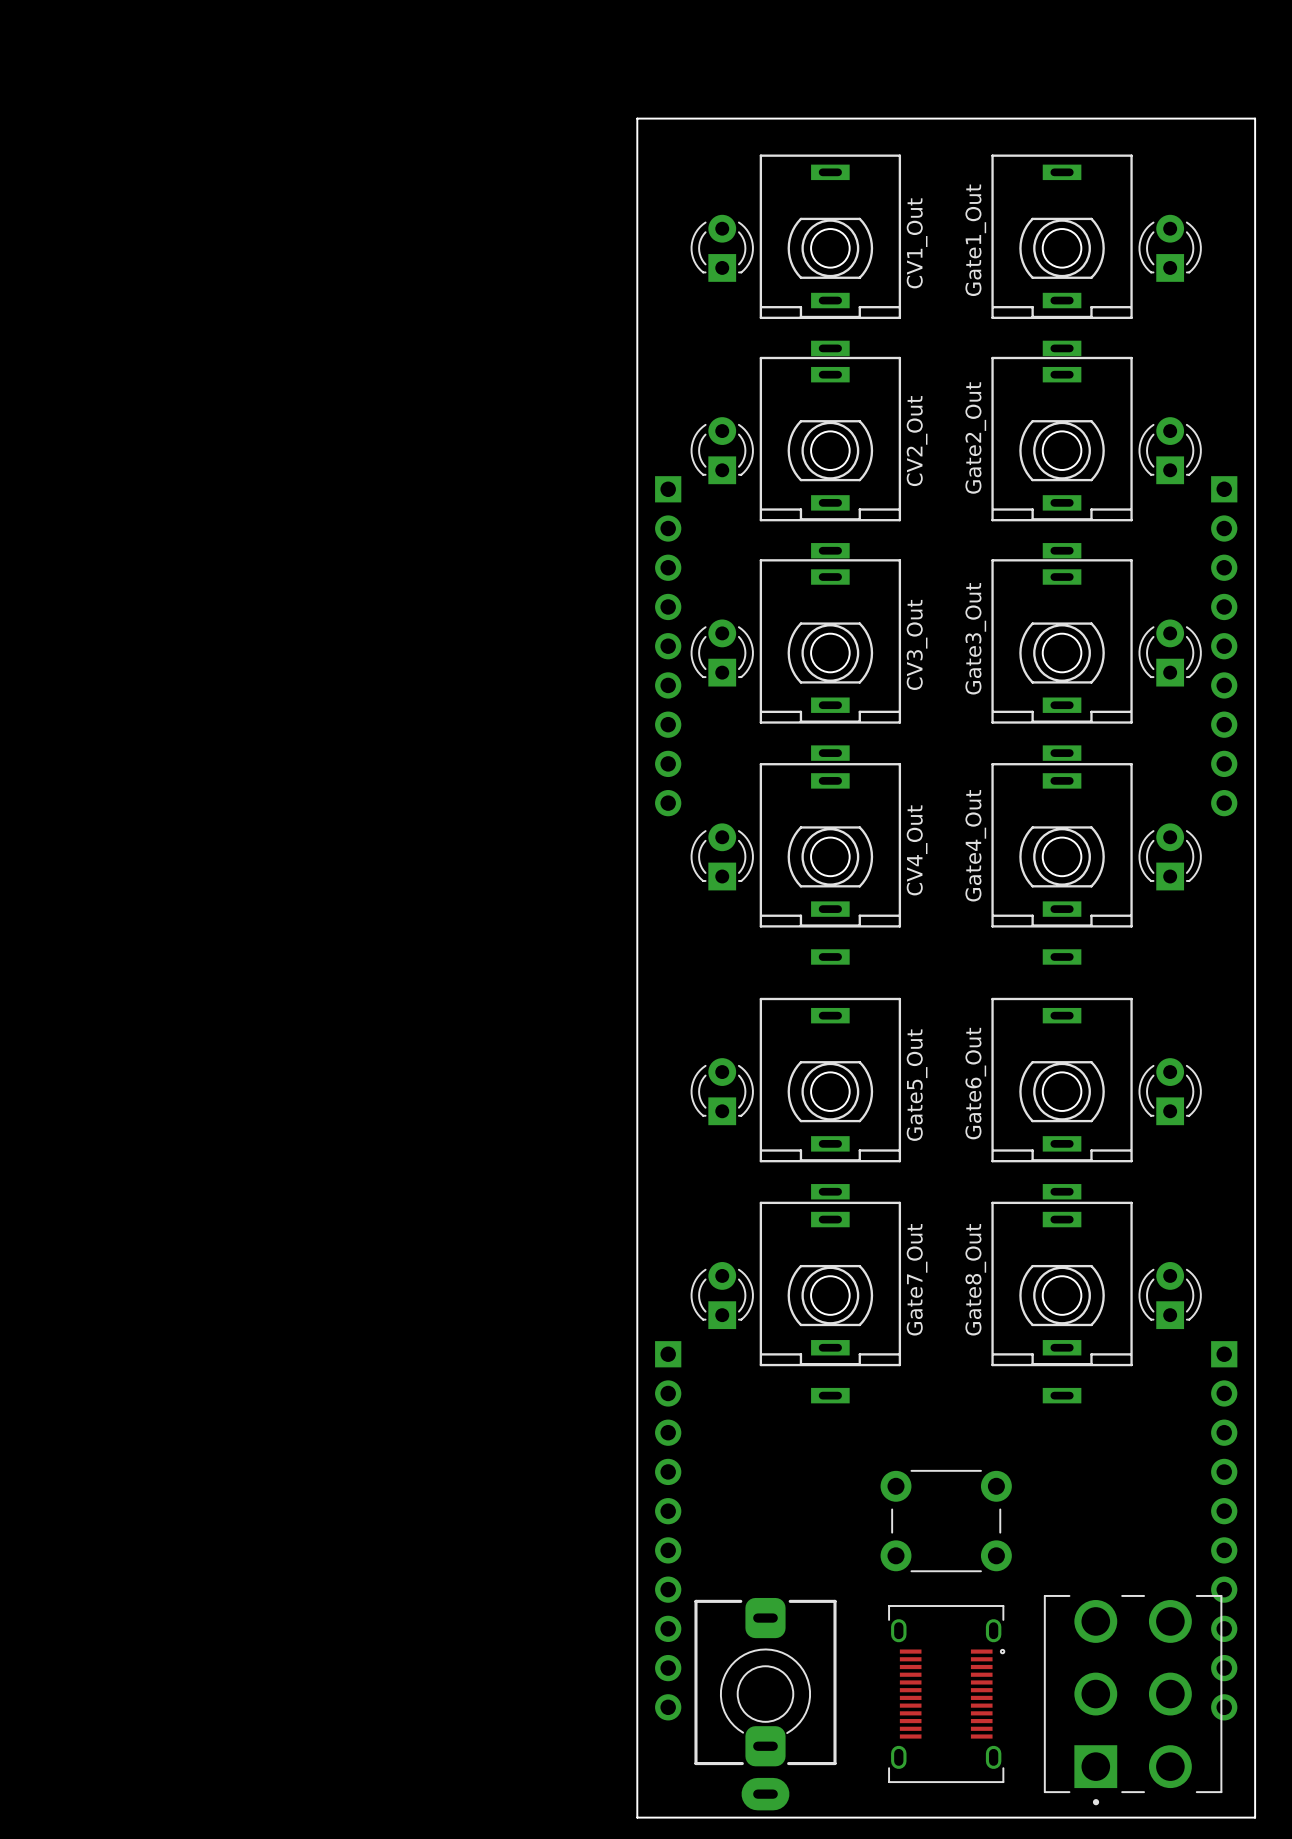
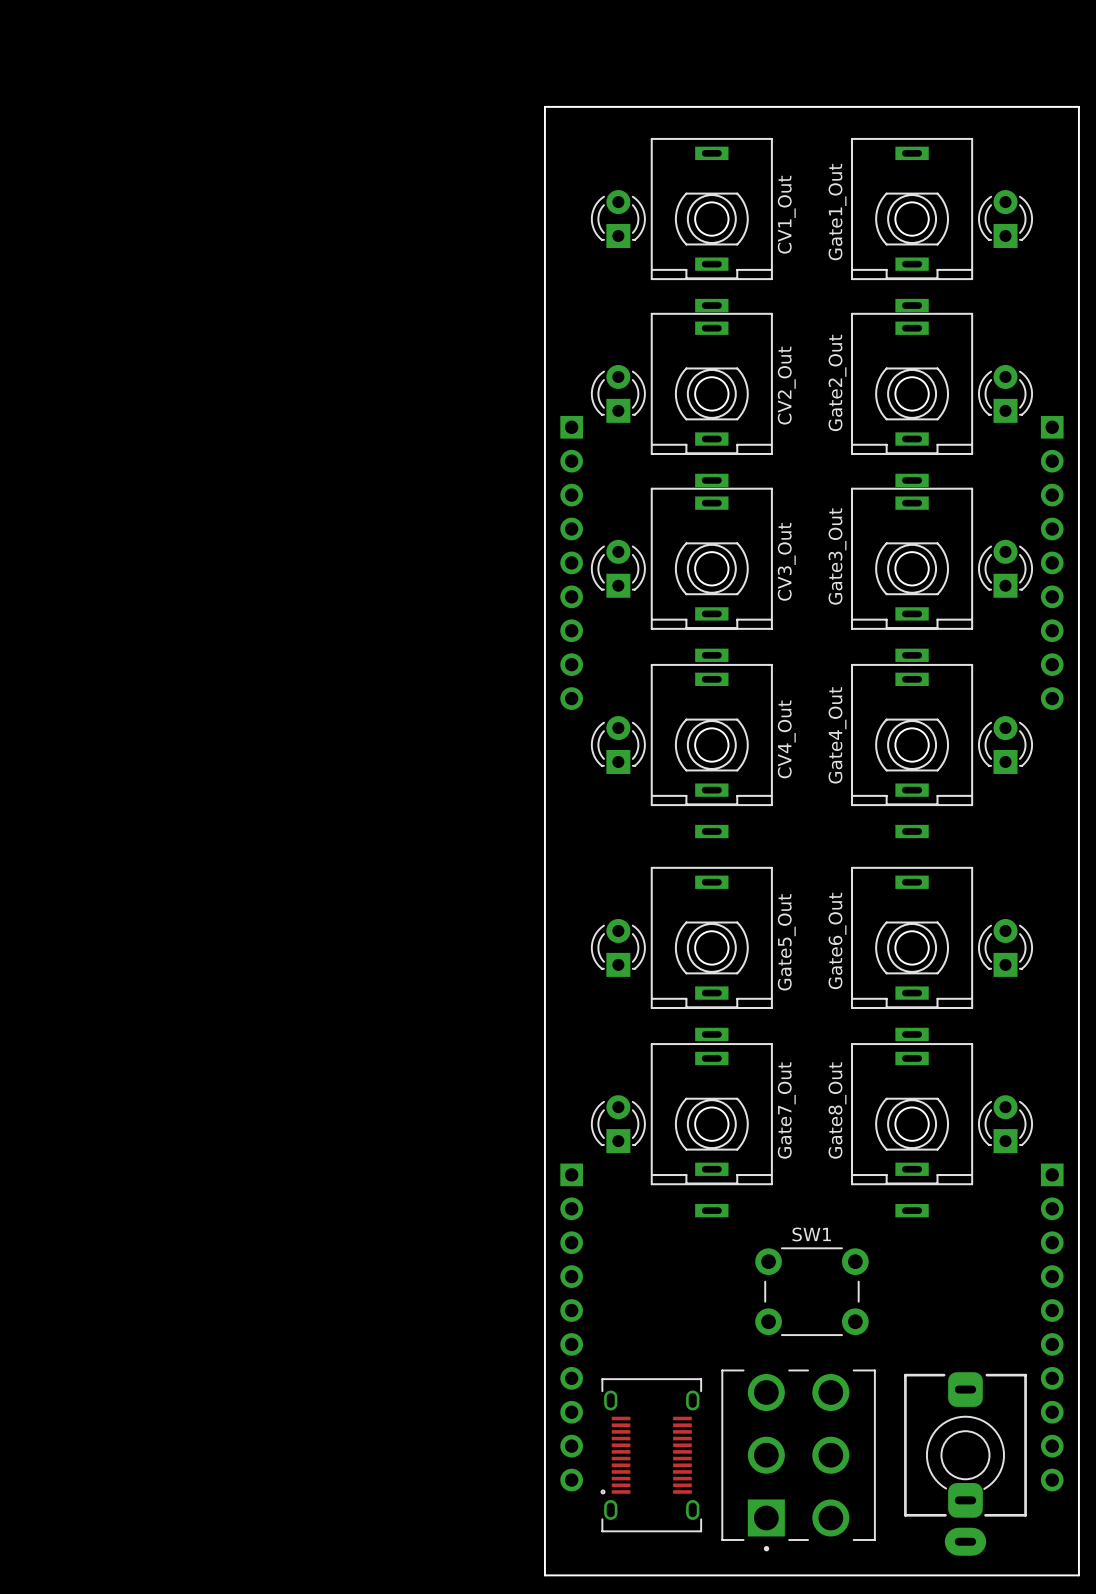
SW1: none -> (811, 1291)
part: (946, 1521) -> none
part footprint: [1043, 1594, 1223, 1806] -> [904, 1372, 1027, 1556]
part: none -> (798, 1460)
part rotation: 0° (946, 1694) -> 180° (651, 1455)
part position: (946, 1694) -> (651, 1455)
part: (765, 1704) -> none

